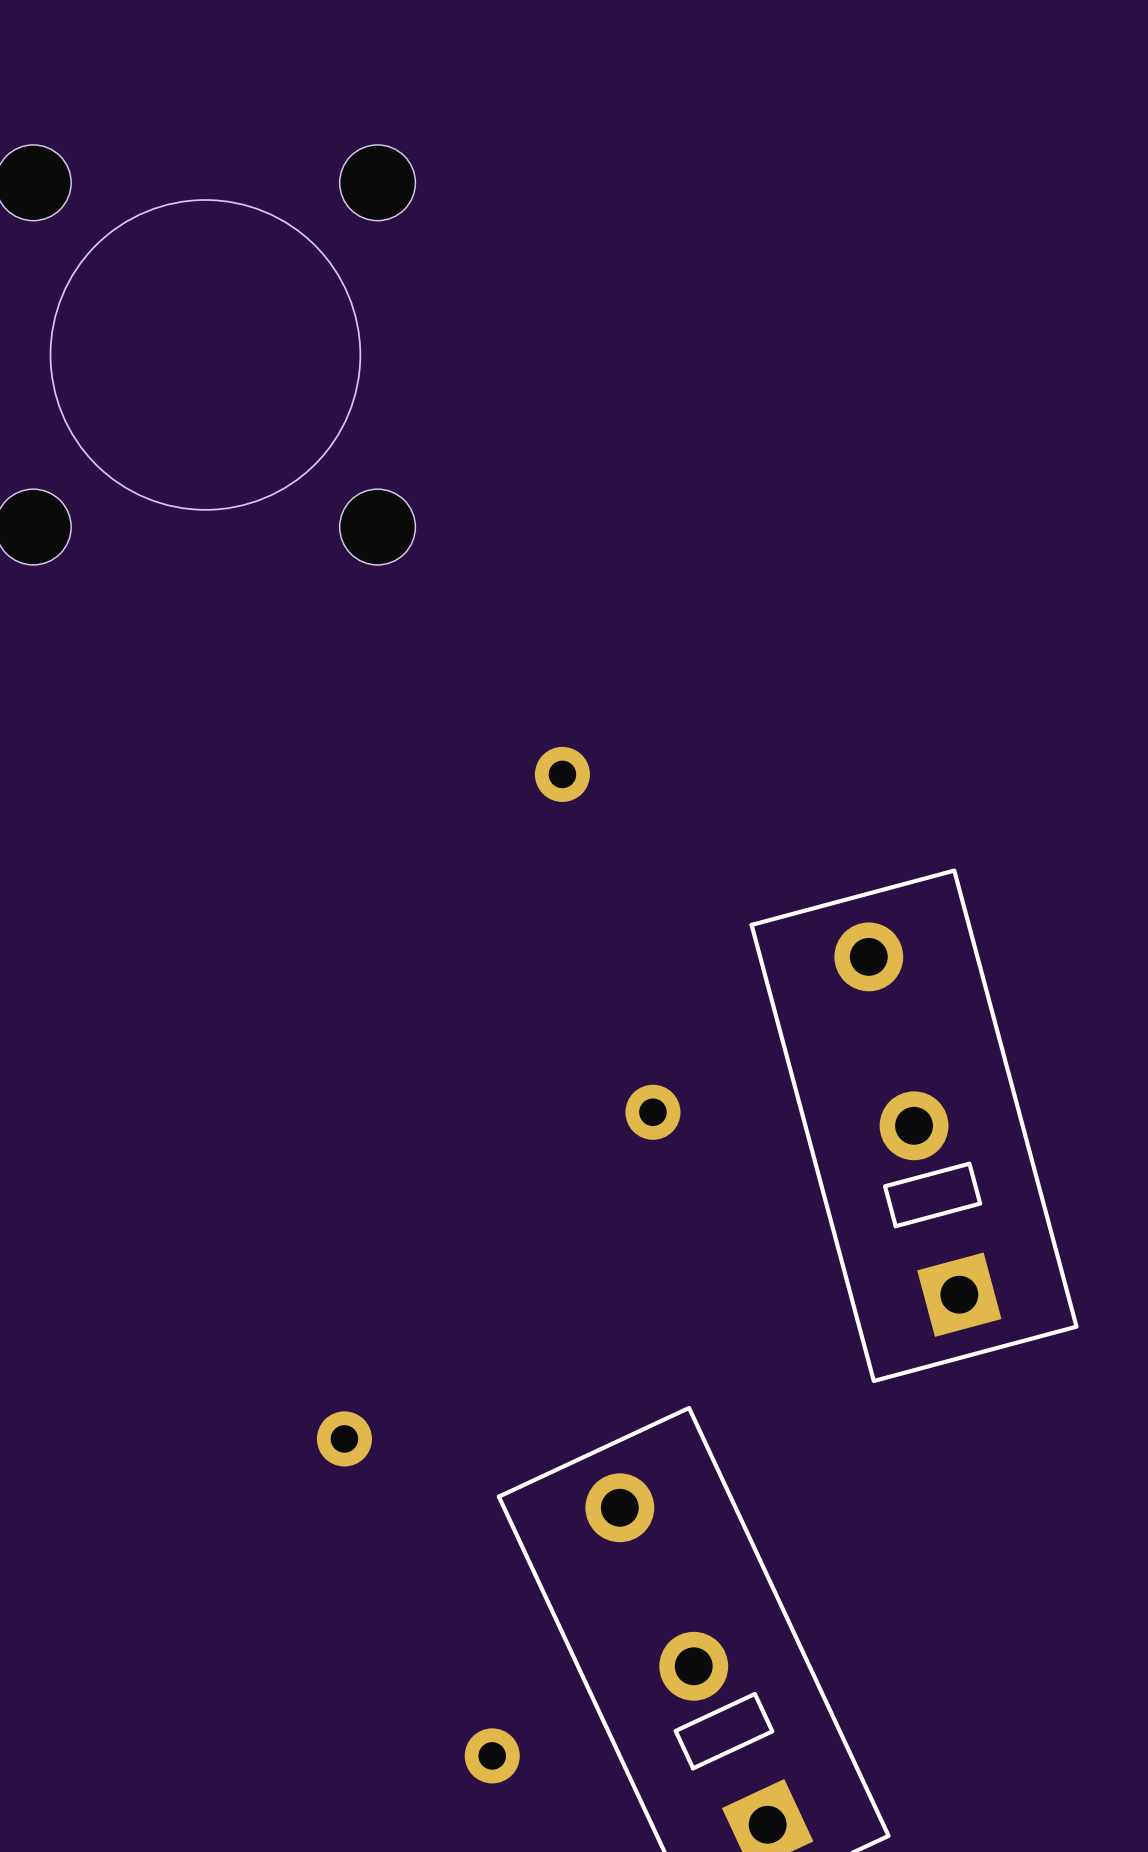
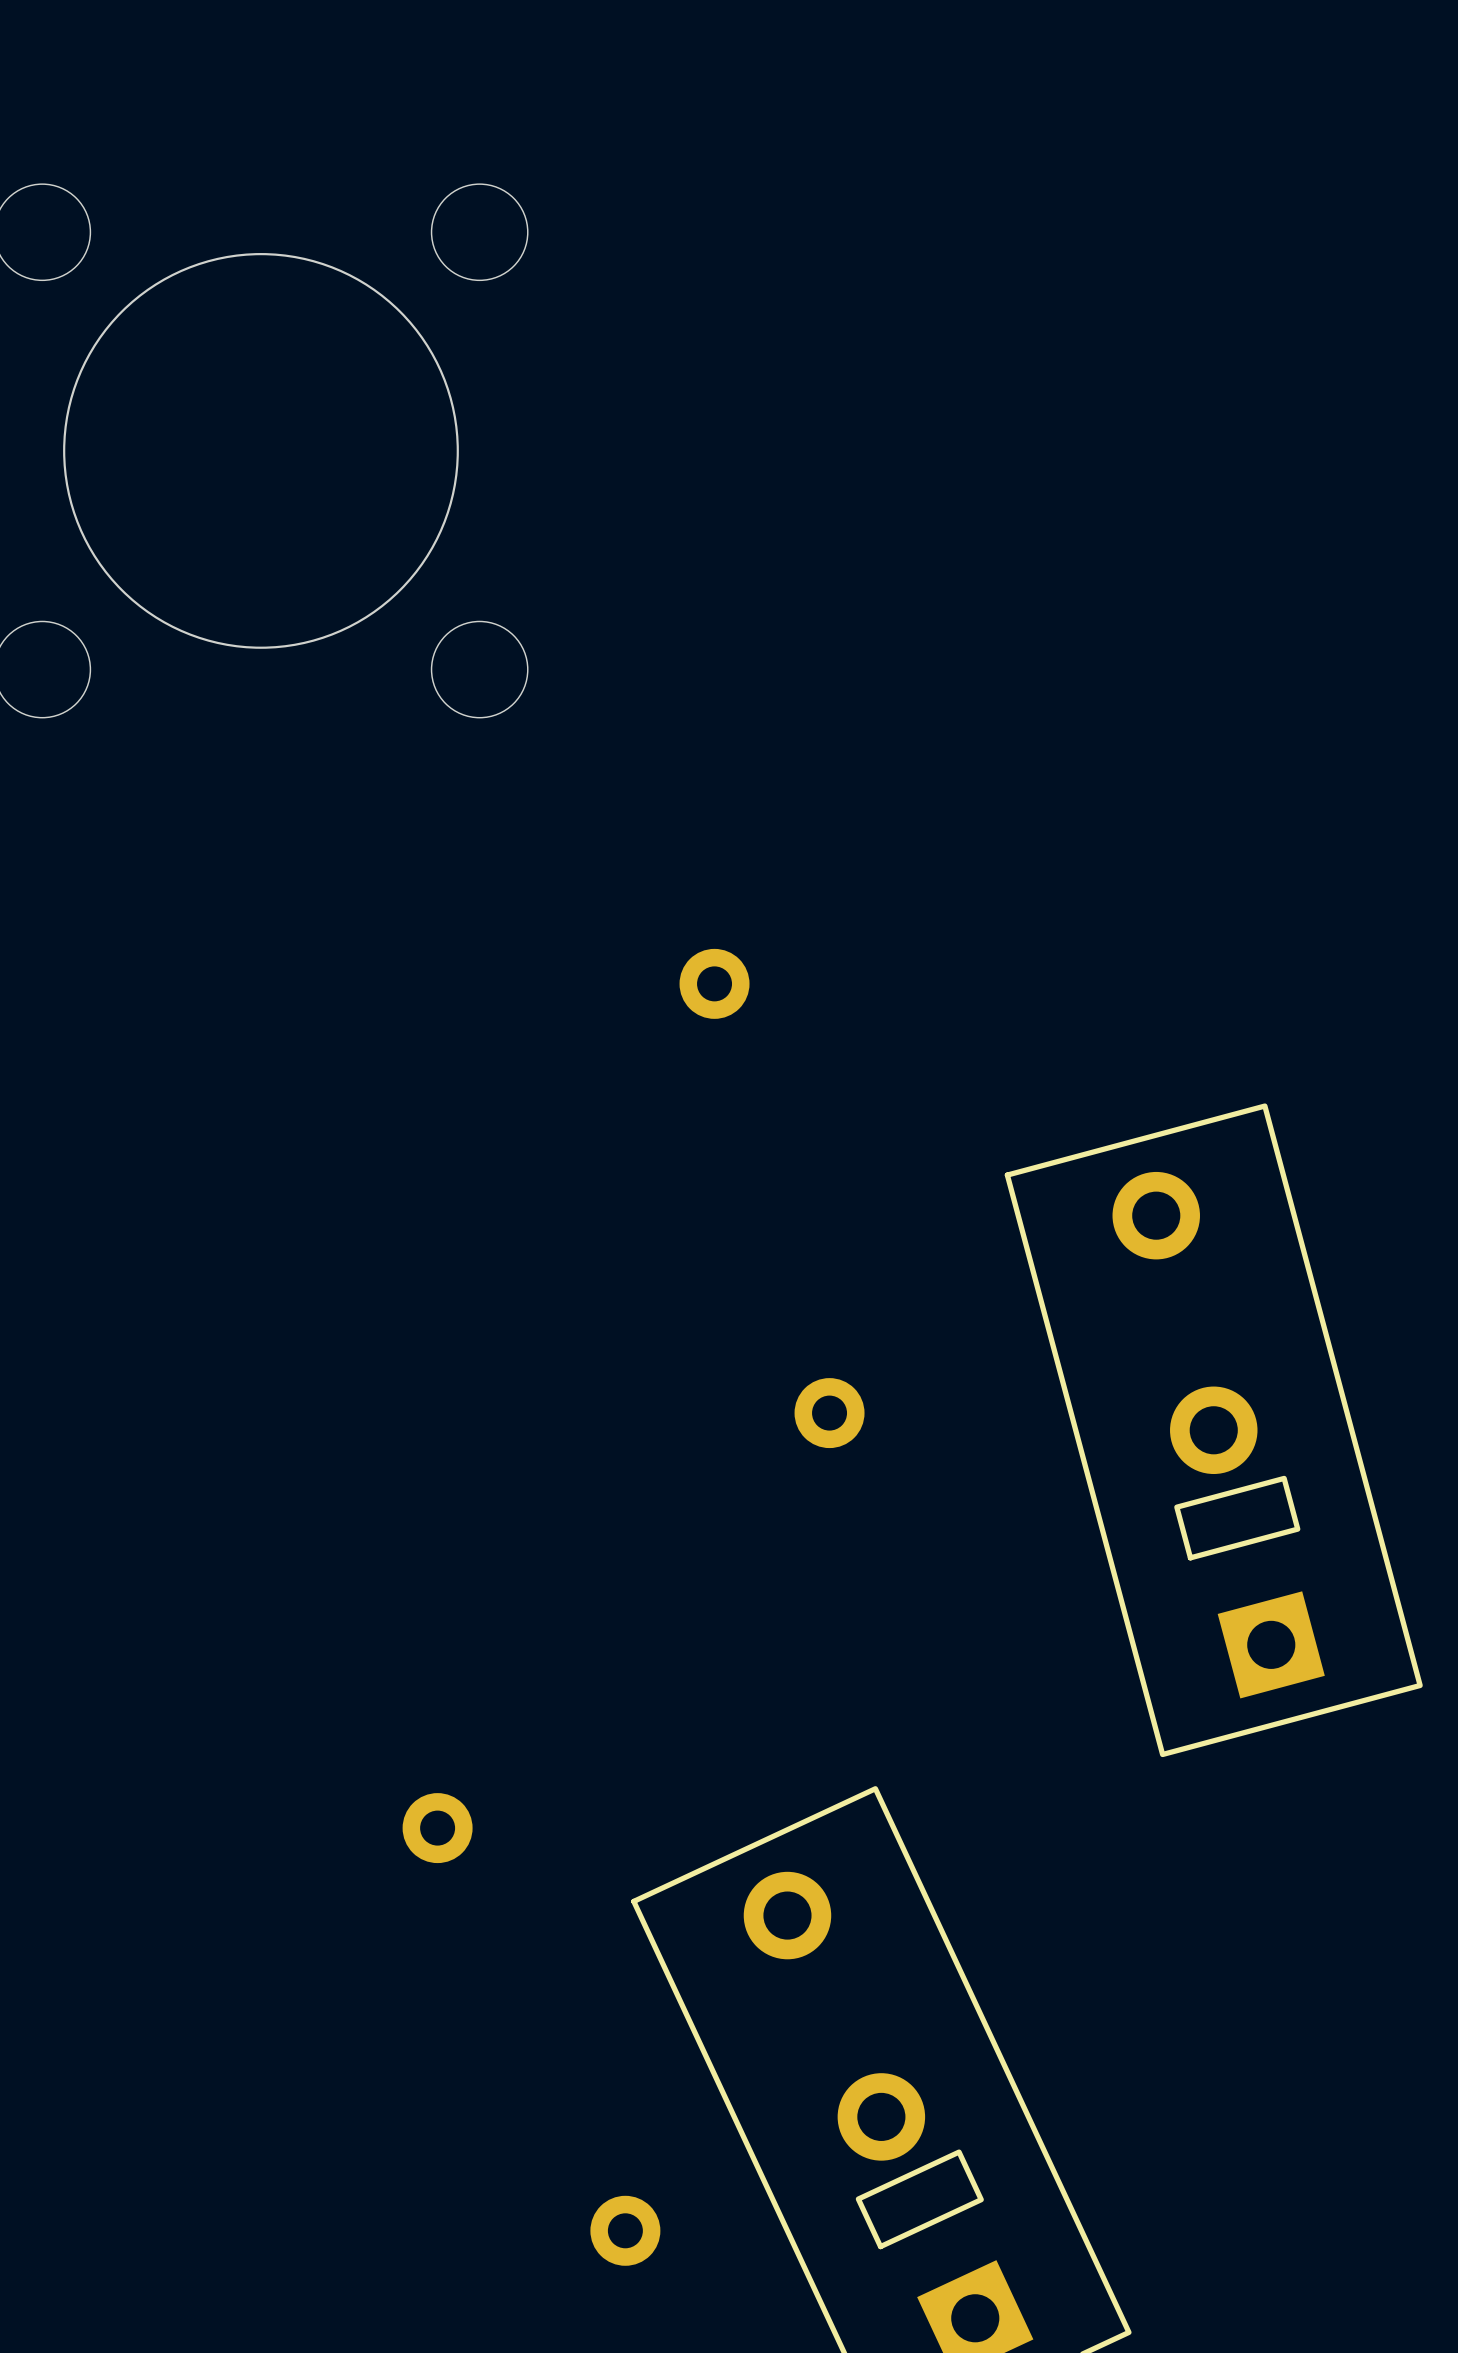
part position: (914, 1125) -> (1213, 1430)

